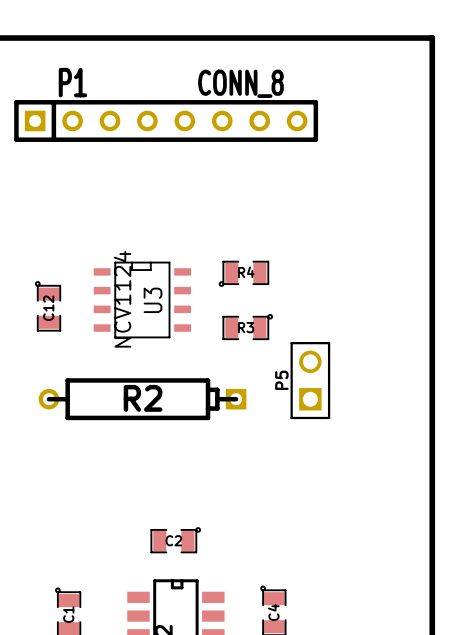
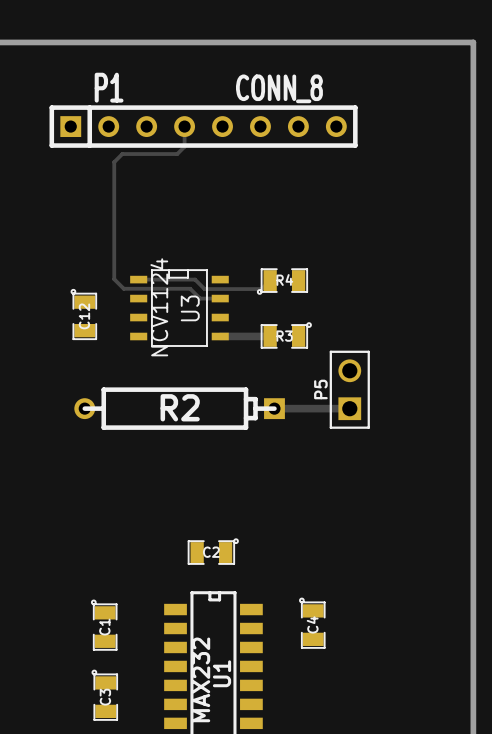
track: none -> (184, 126) (184, 146) (177, 154) (122, 154) (114, 162) (114, 279) (123, 288) (190, 288) (200, 298) (220, 298)
track: none -> (138, 279) (195, 279) (204, 289) (261, 289) (270, 280)
track: none -> (220, 336) (270, 336)
track: none -> (274, 408) (349, 408)

